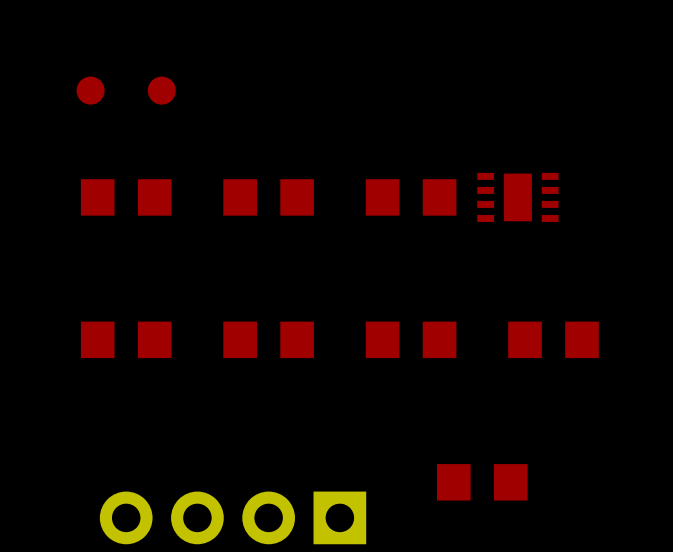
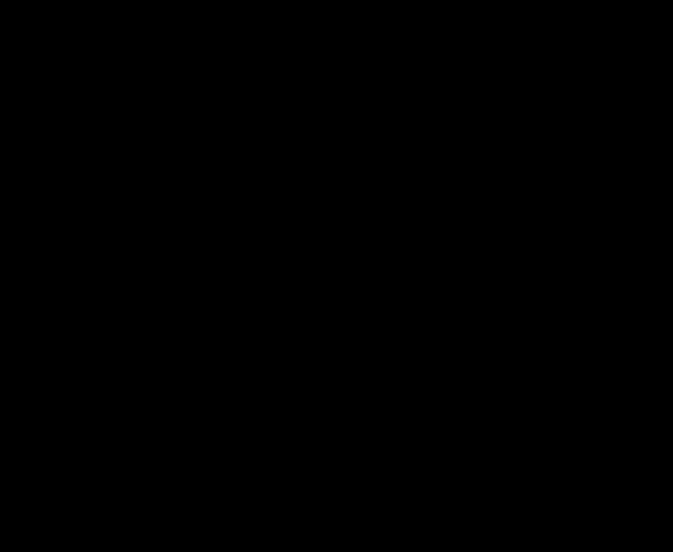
part: (90, 90) -> none
part: (161, 90) -> none
part: (126, 197) -> none
part: (268, 197) -> none
part: (411, 197) -> none
part: (517, 197) -> none
part: (126, 339) -> none
part: (268, 339) -> none
part: (411, 339) -> none
part: (553, 339) -> none
part: (482, 482) -> none
part: (233, 517) -> none

